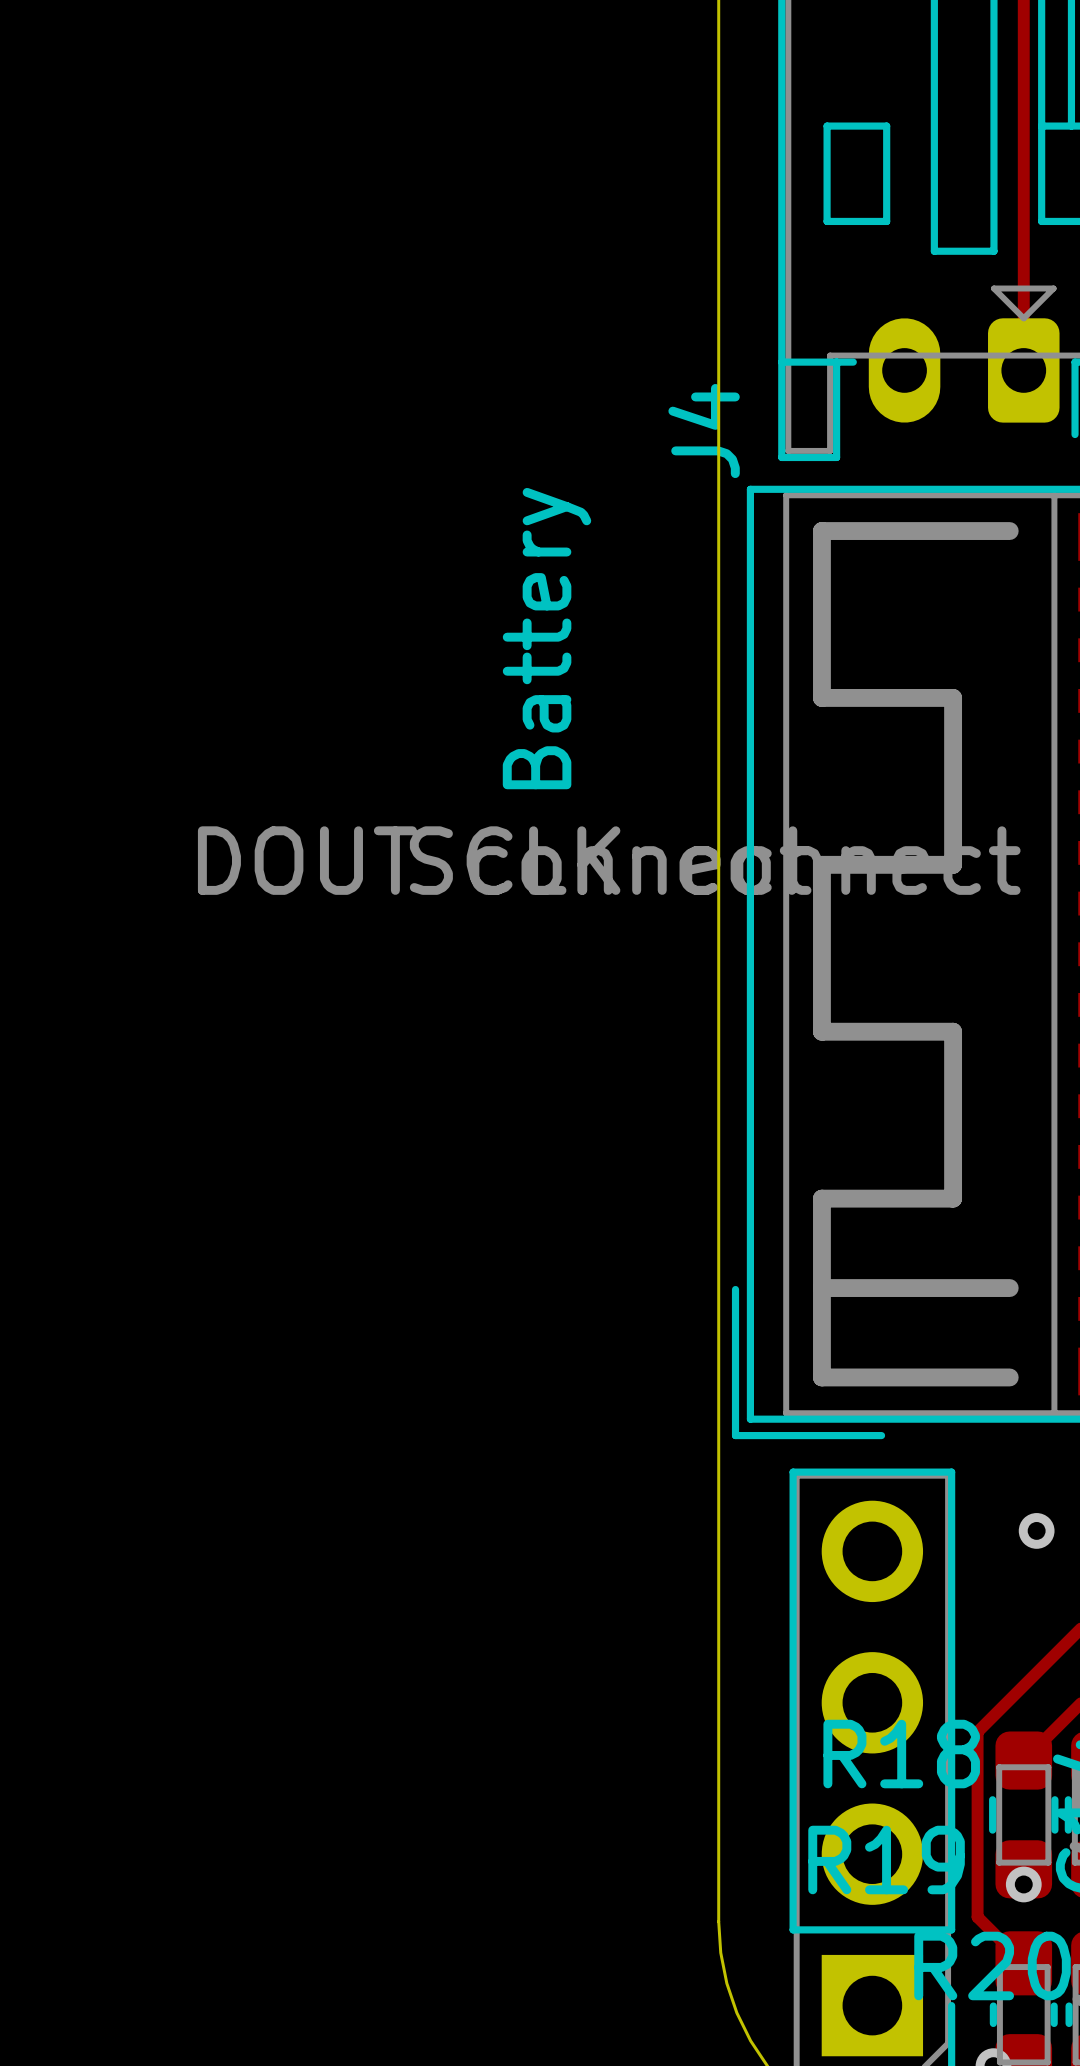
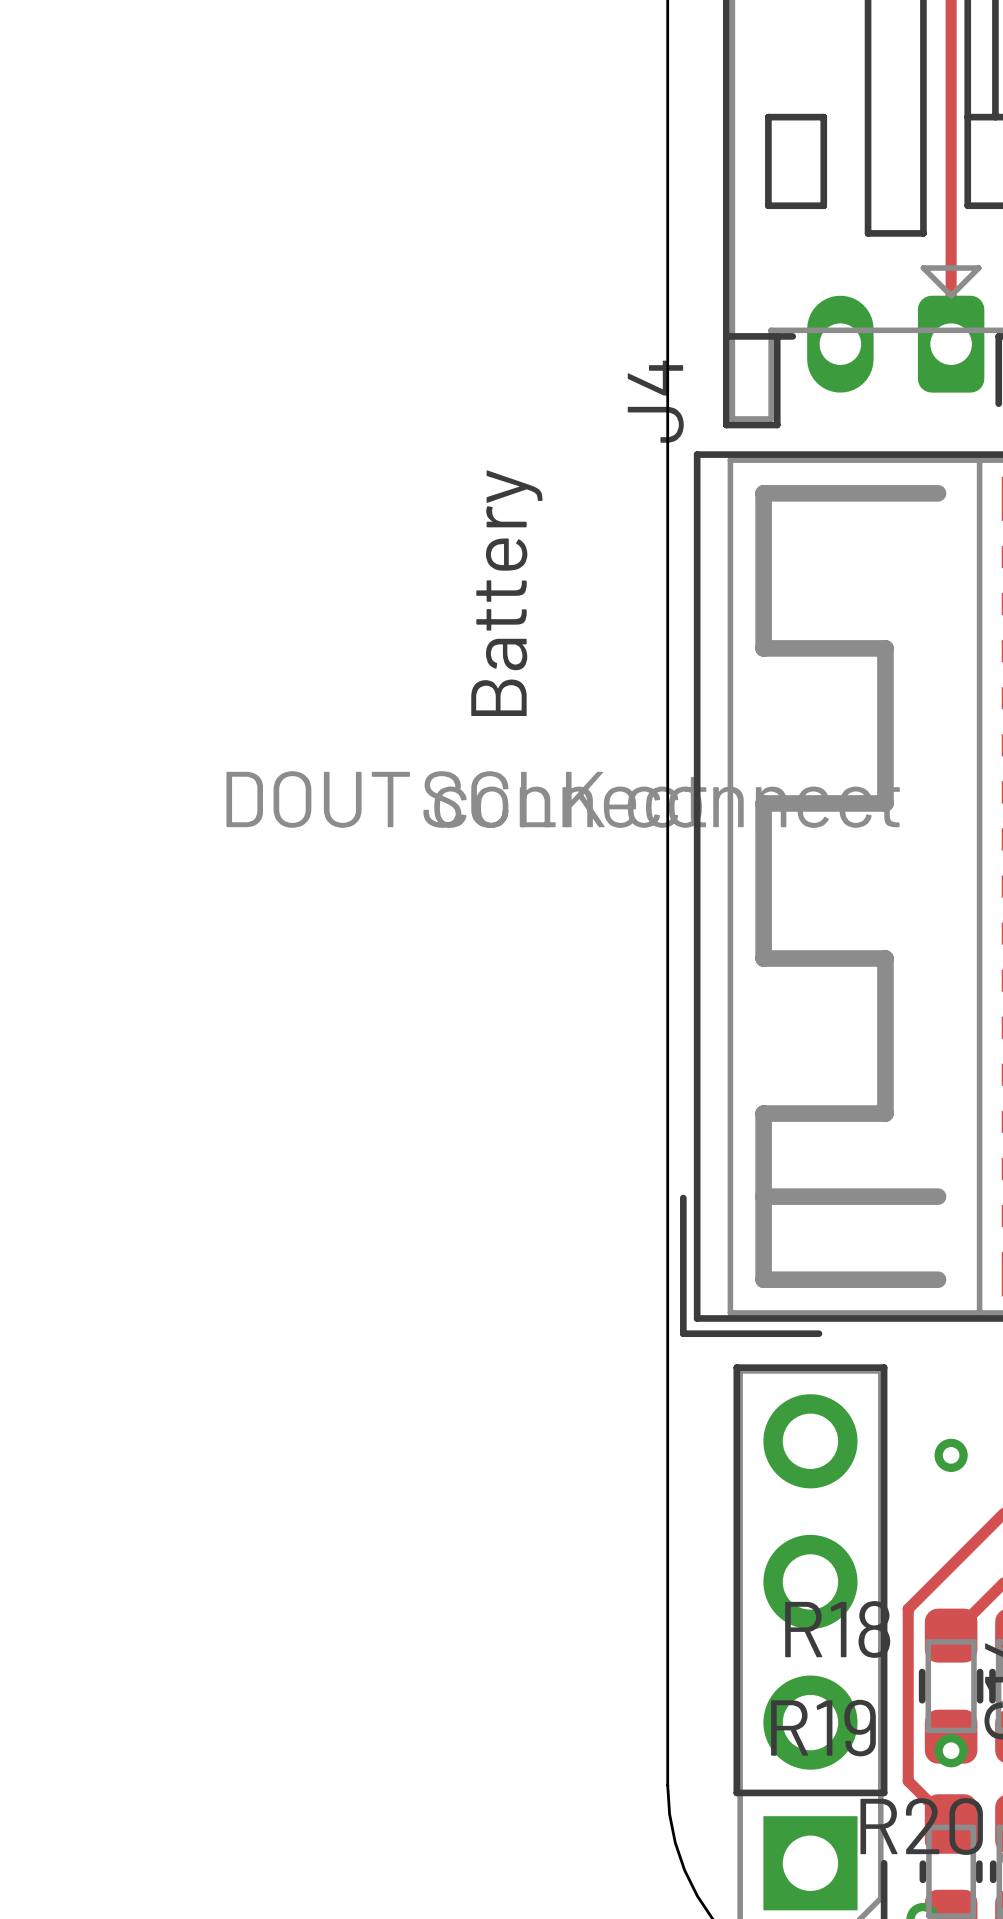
via position: (1036, 1530) -> (951, 1455)

